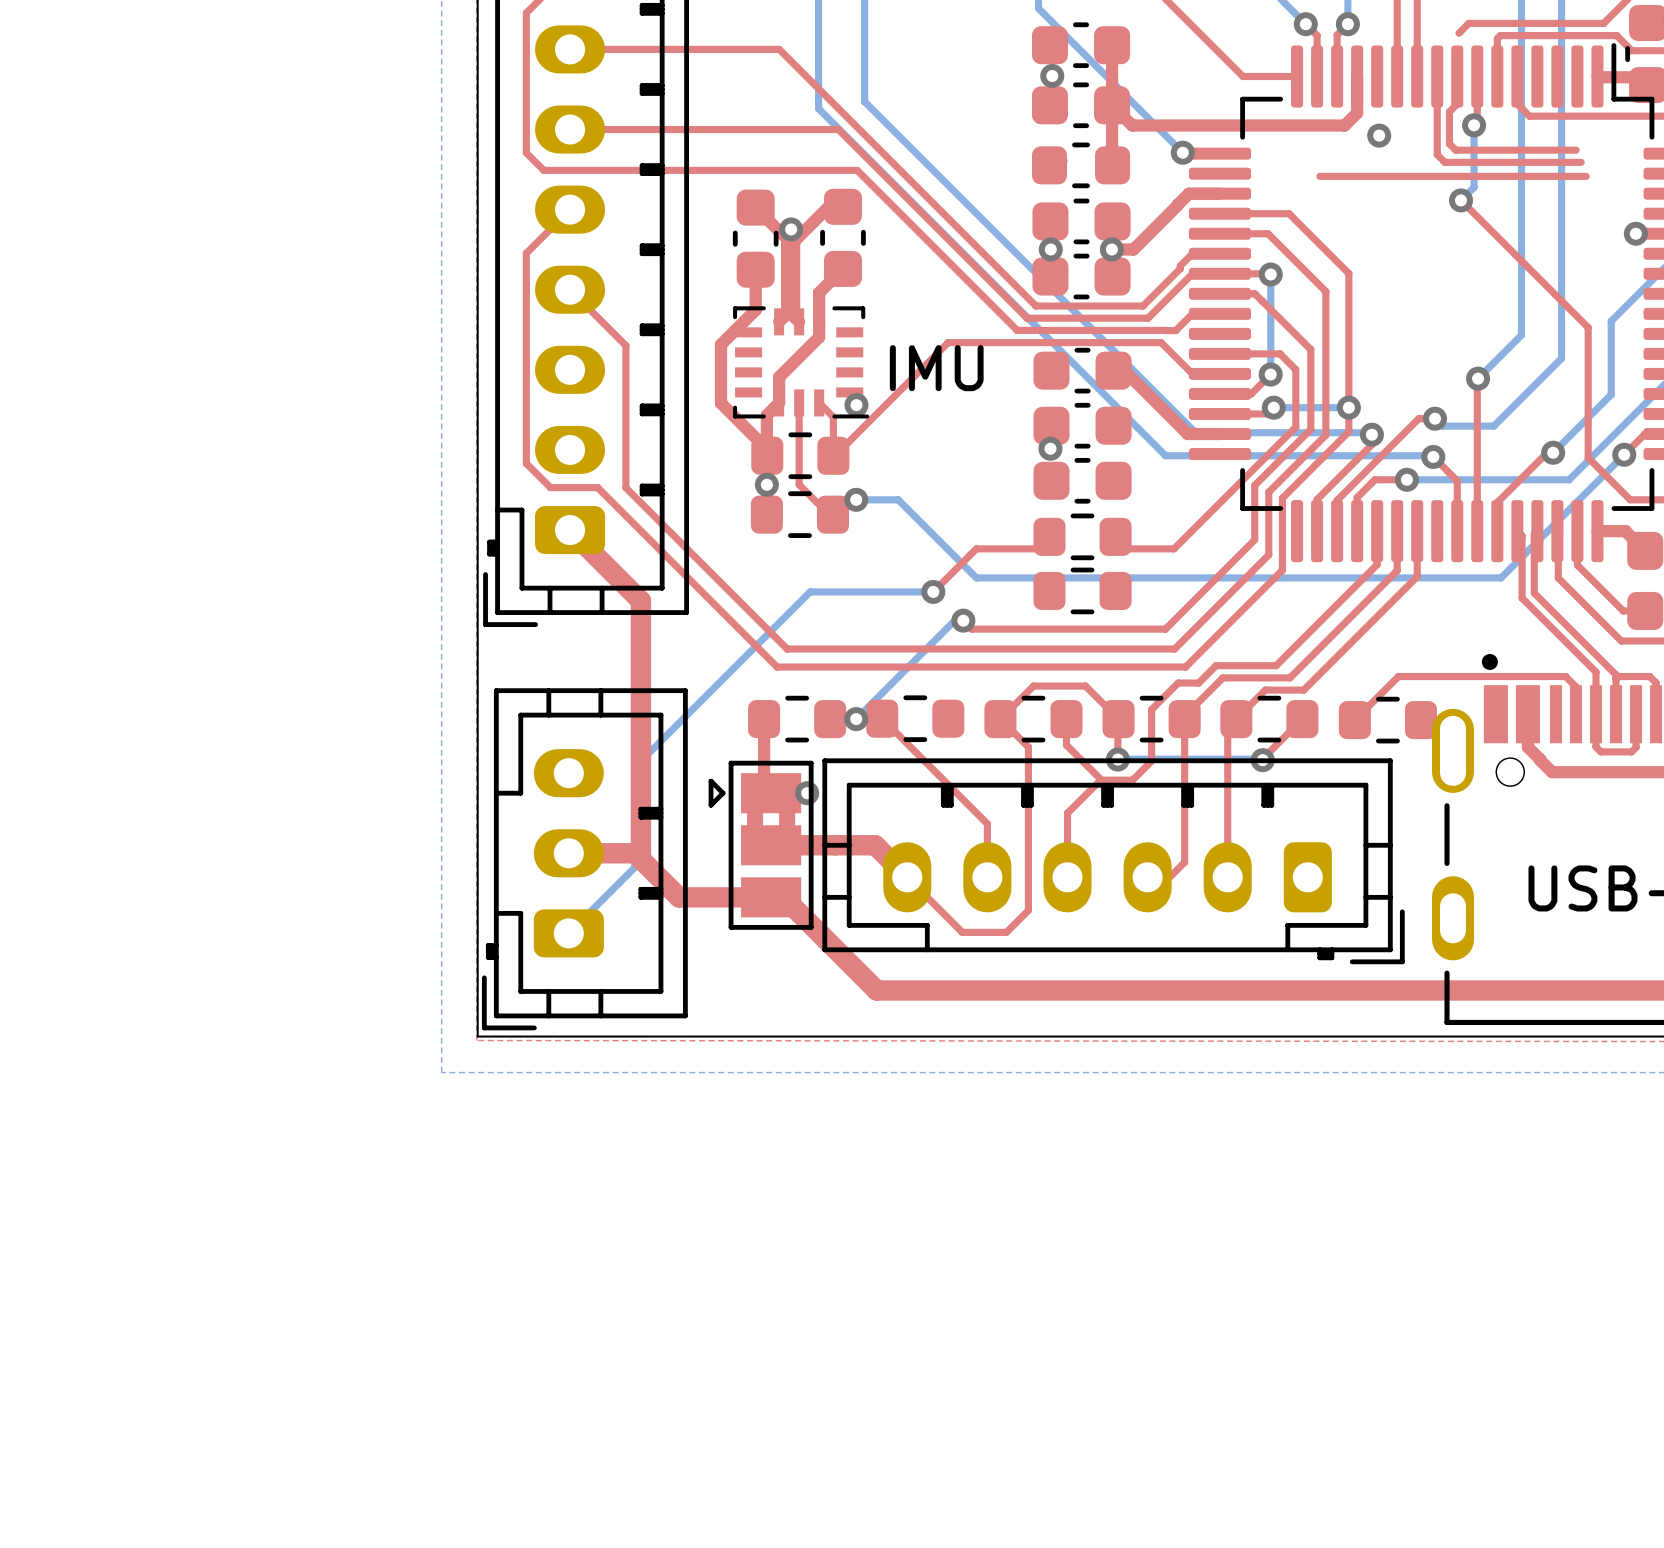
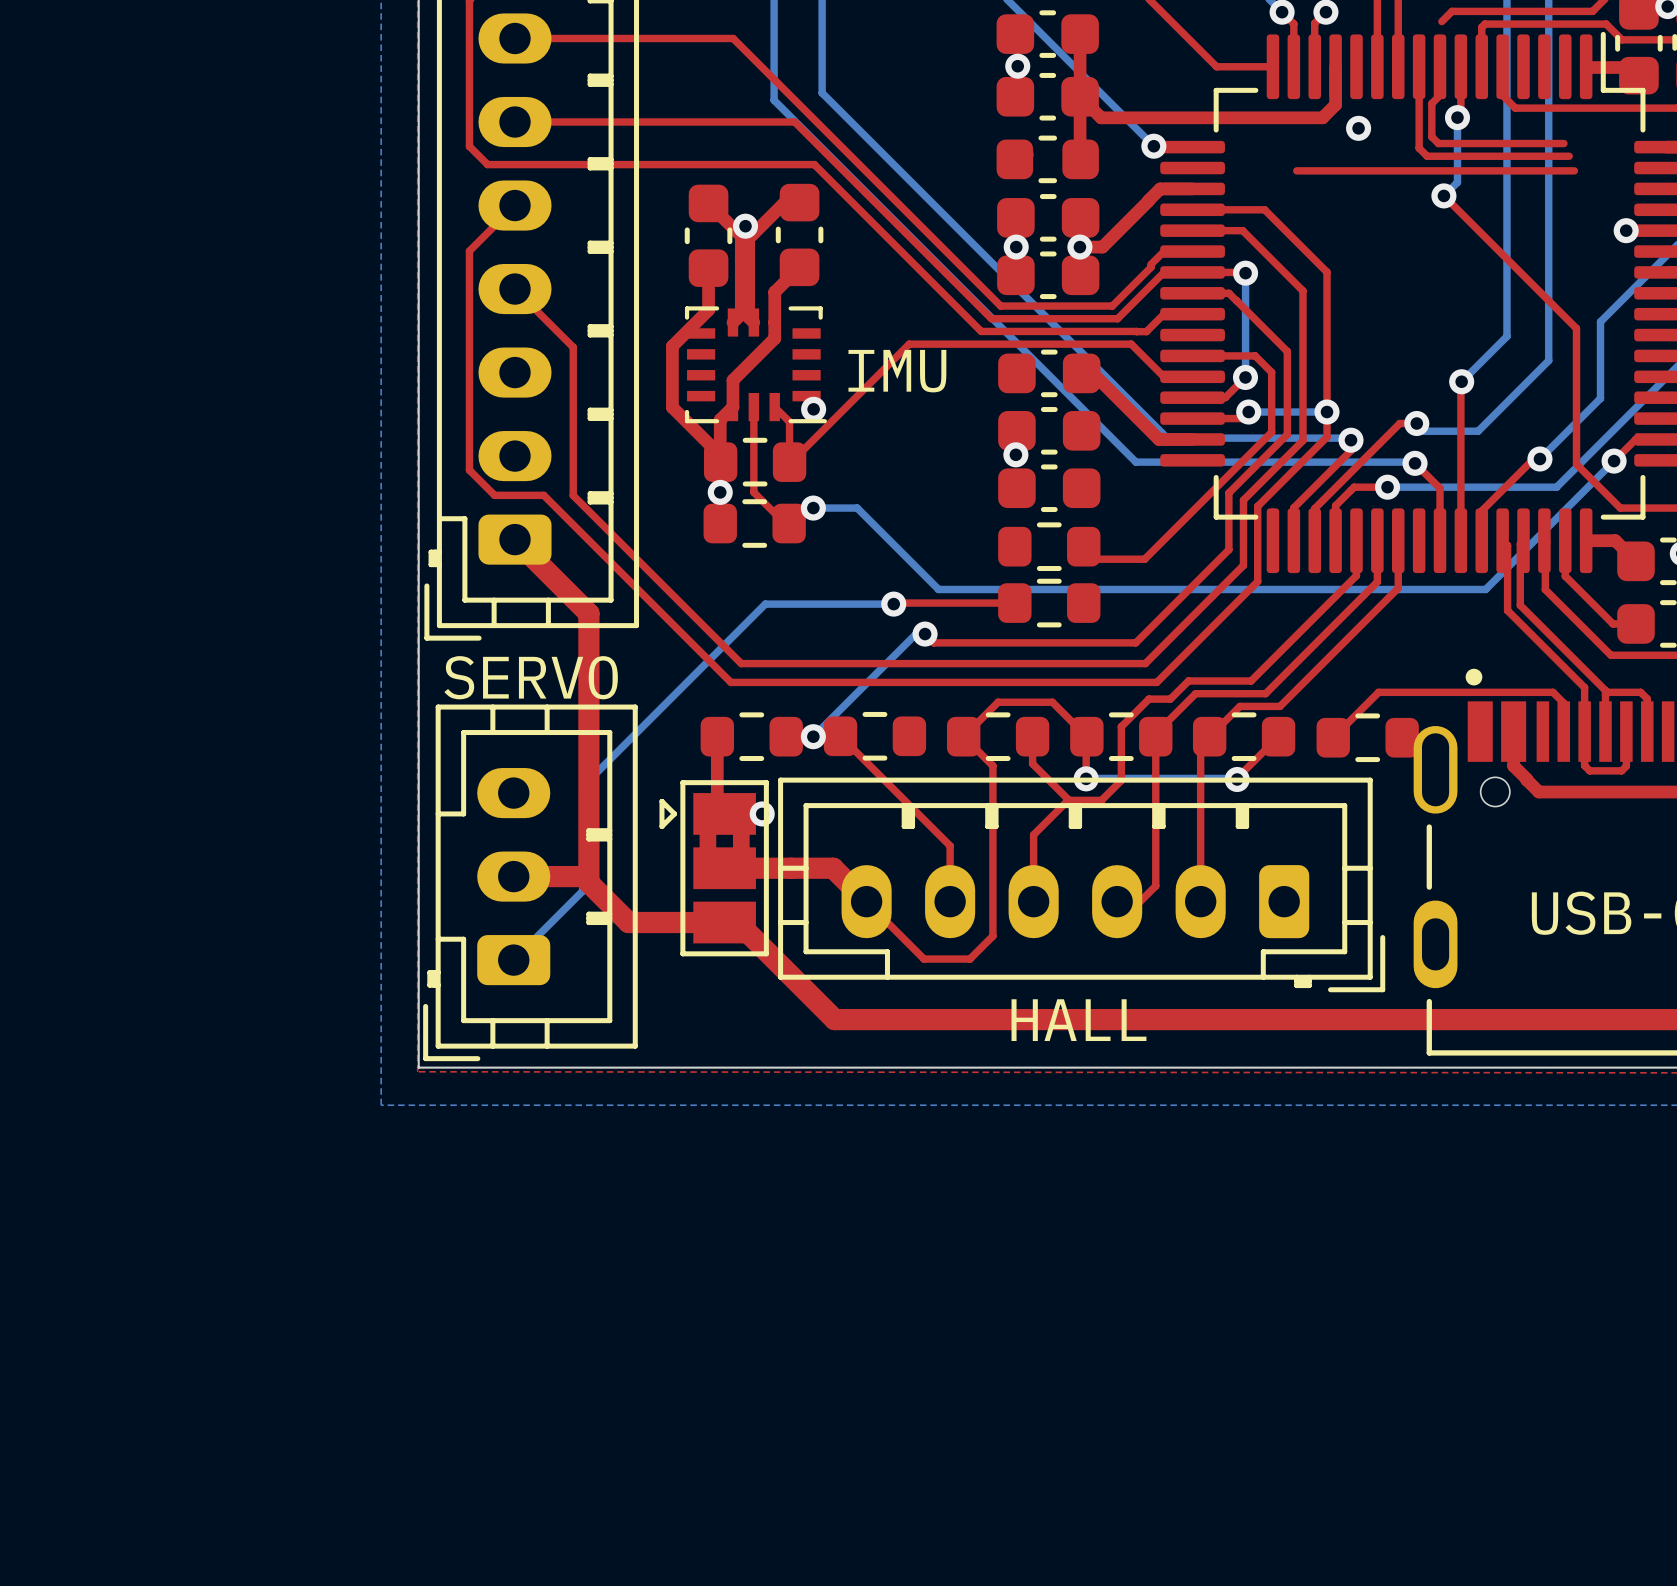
top track: (1050, 548) (976, 548) (934, 590) -> (1014, 603) (894, 603)
text: none -> SERVO (531, 677)
text: none -> HALL (1078, 1020)

